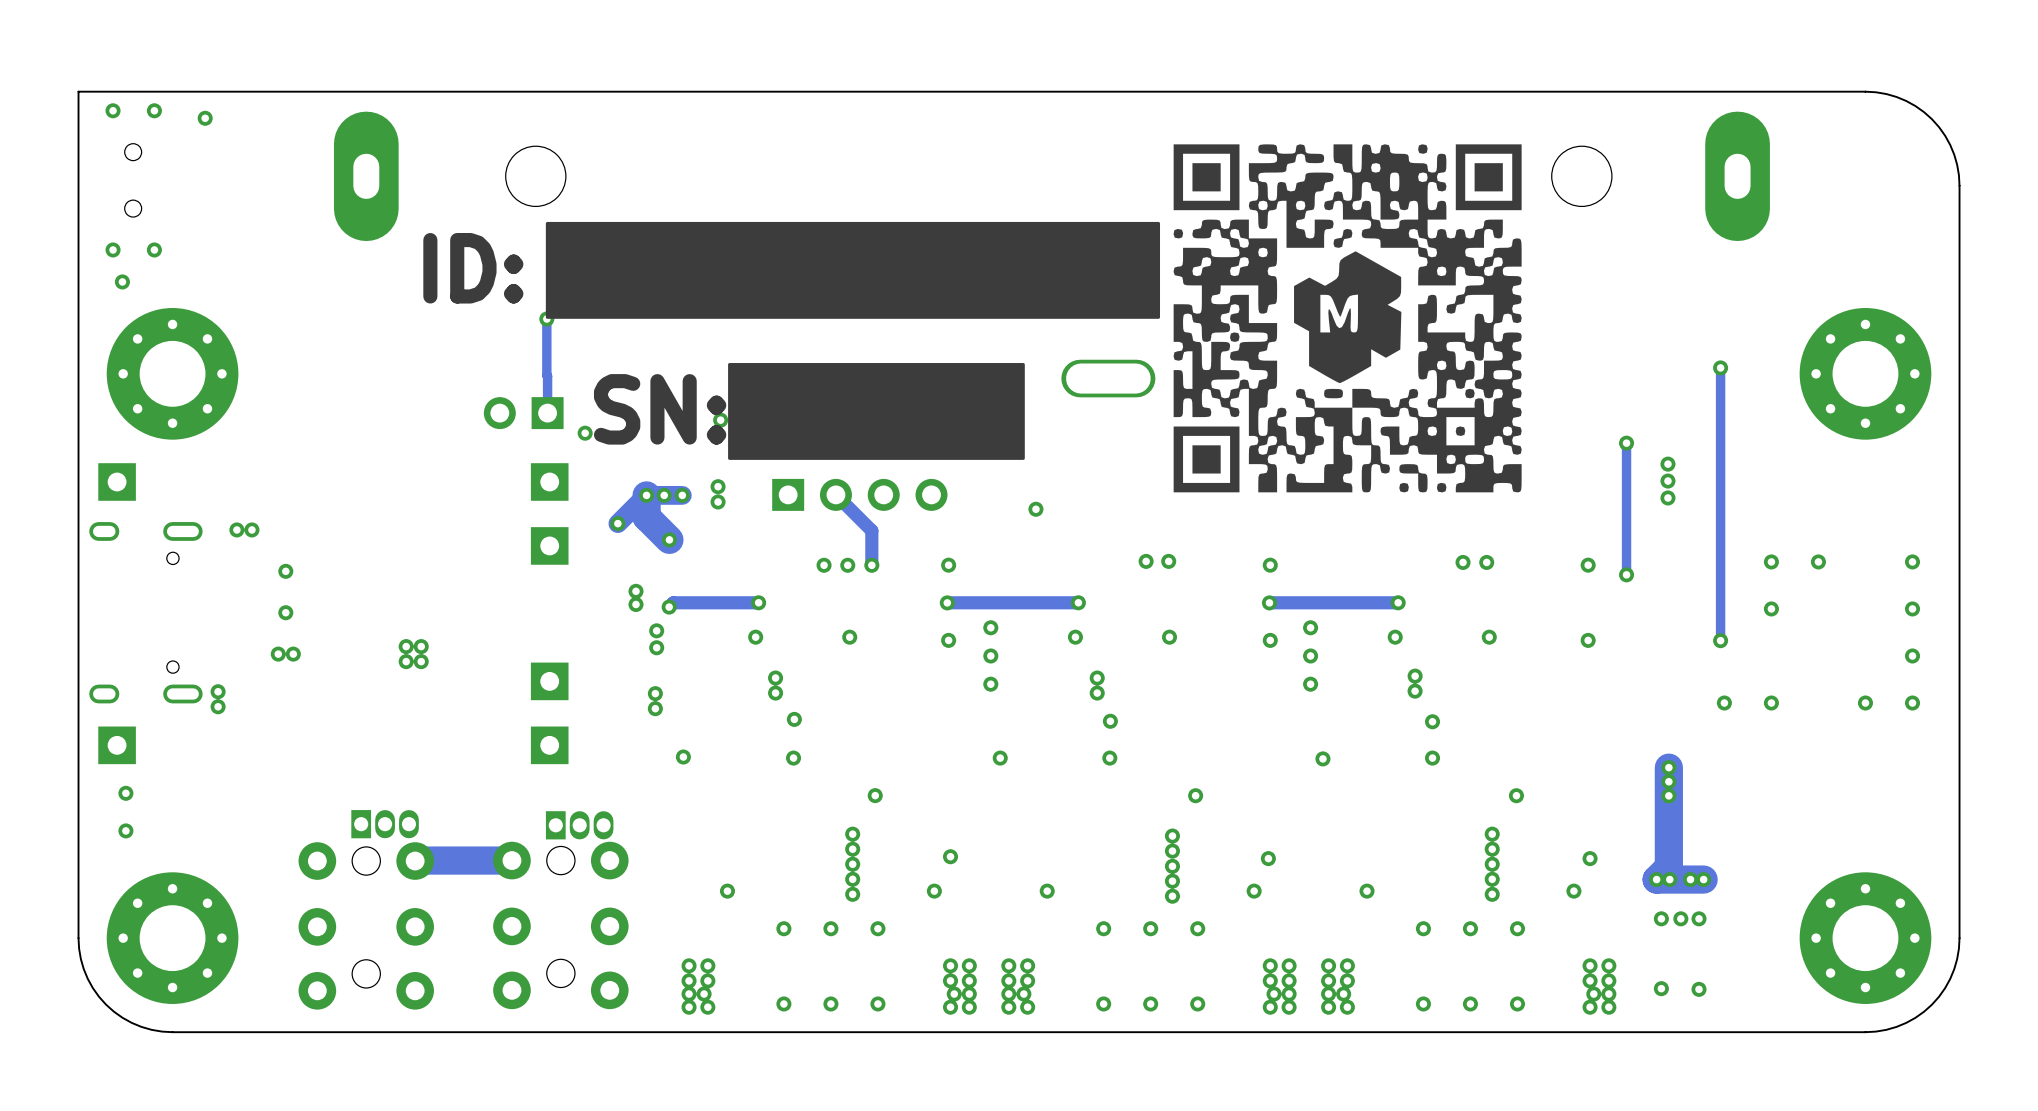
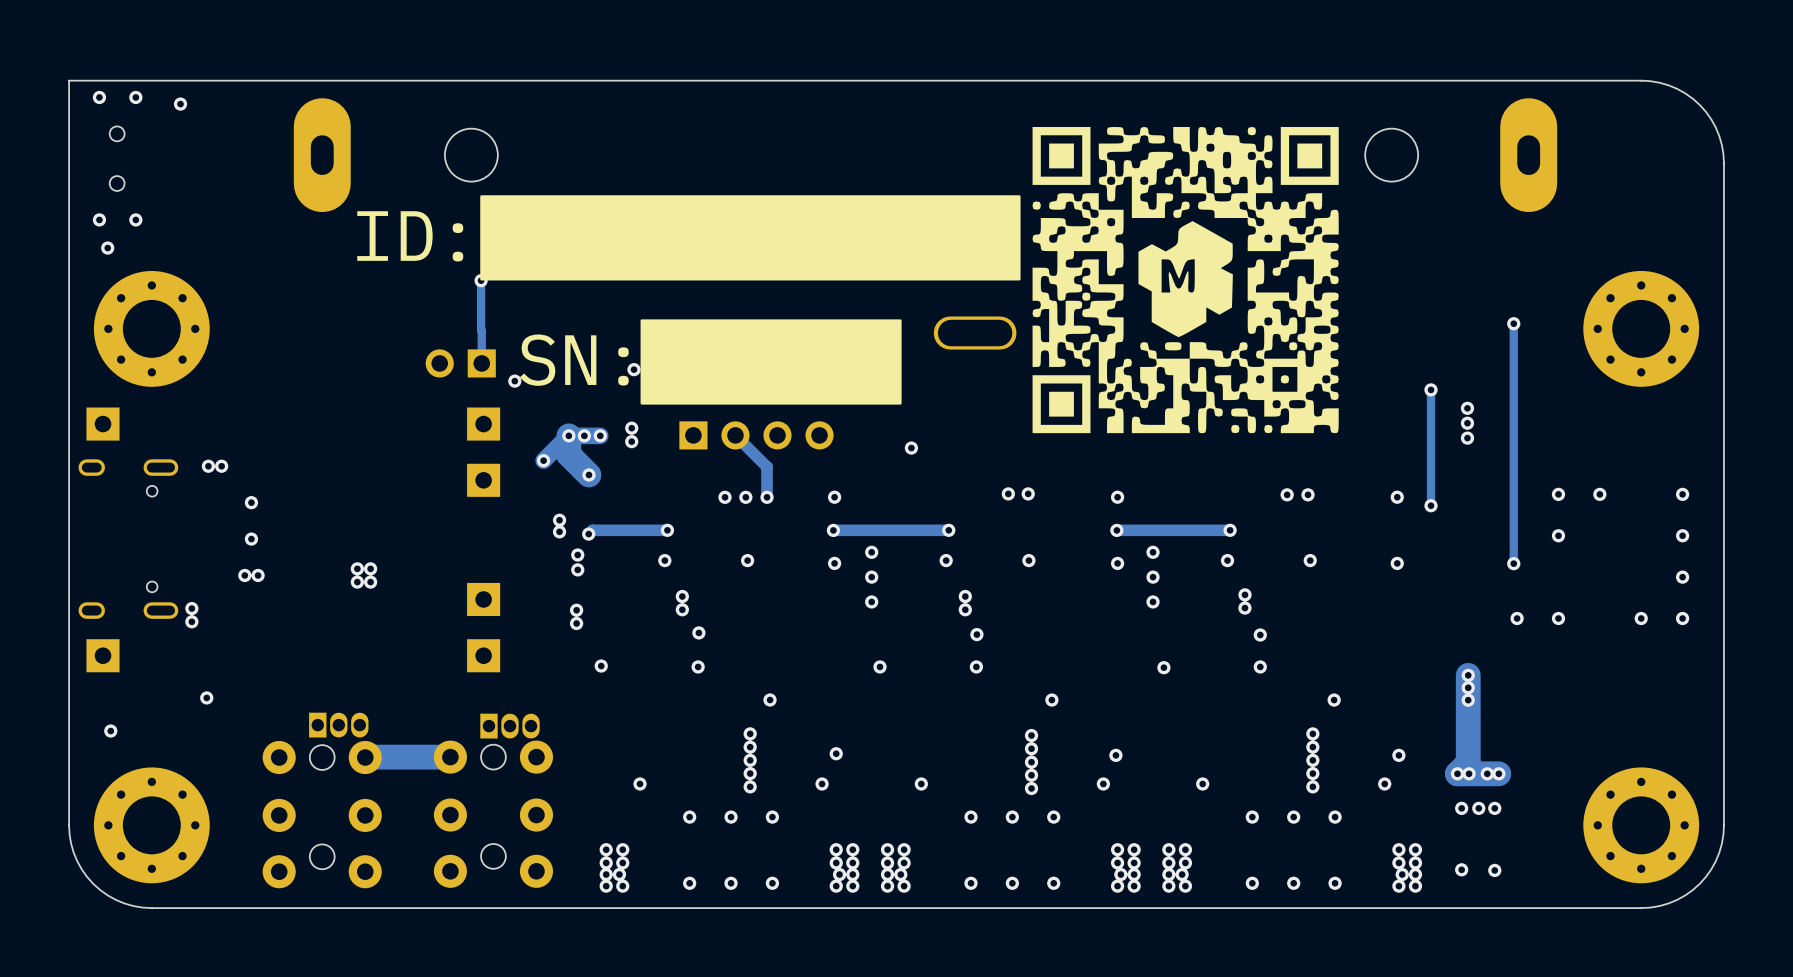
via position: (125, 793) -> (206, 697)

